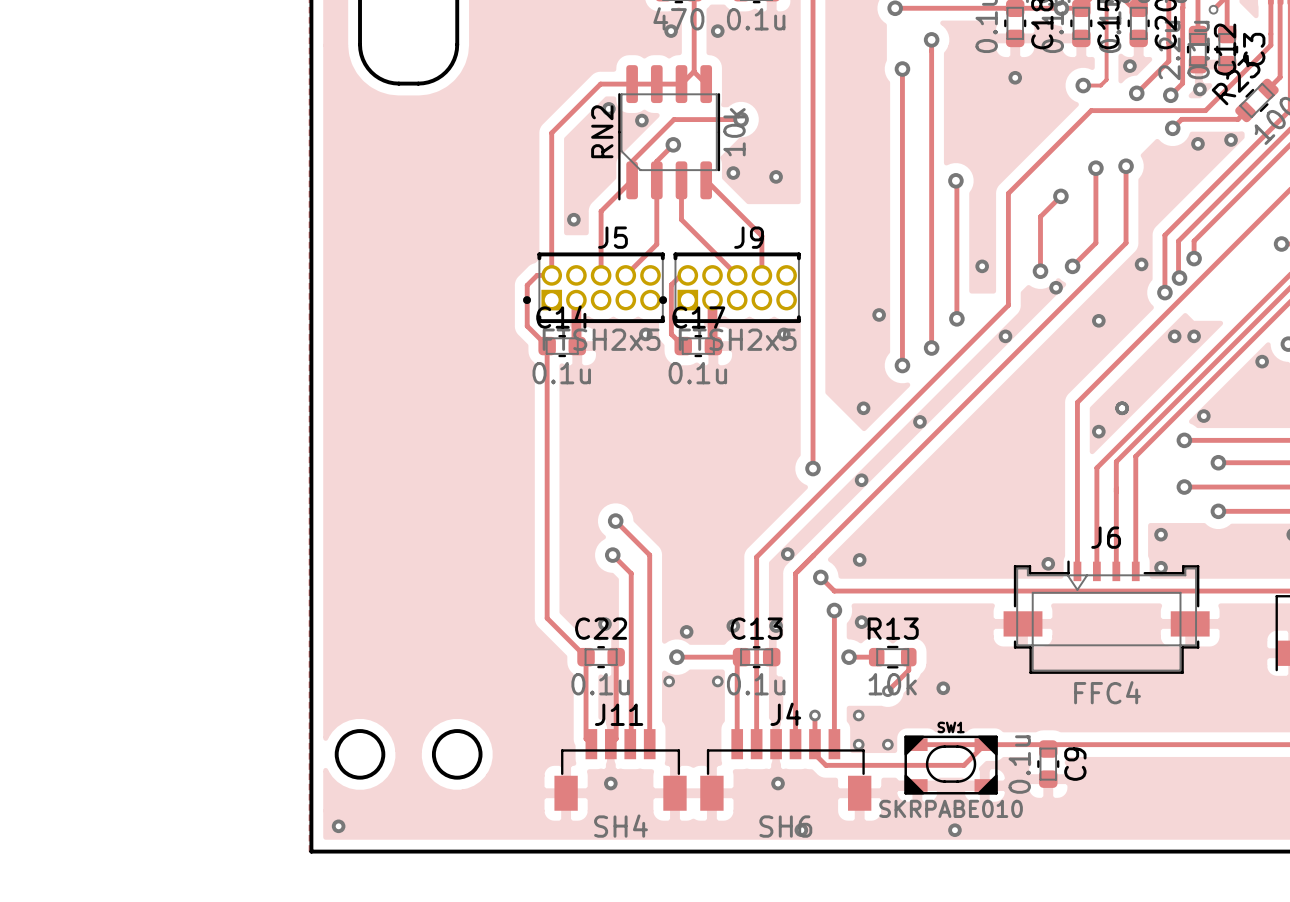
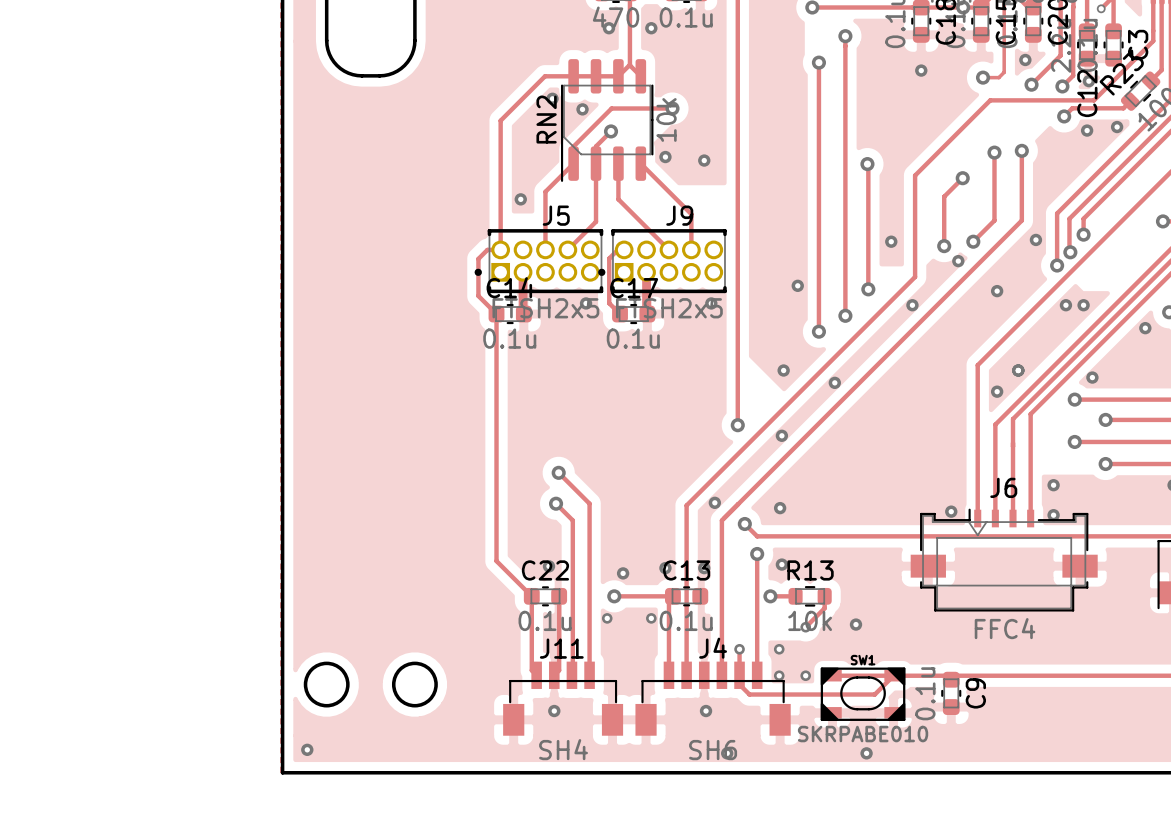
C12 name position: C12 (1225, 49) -> C12 (1087, 93)

